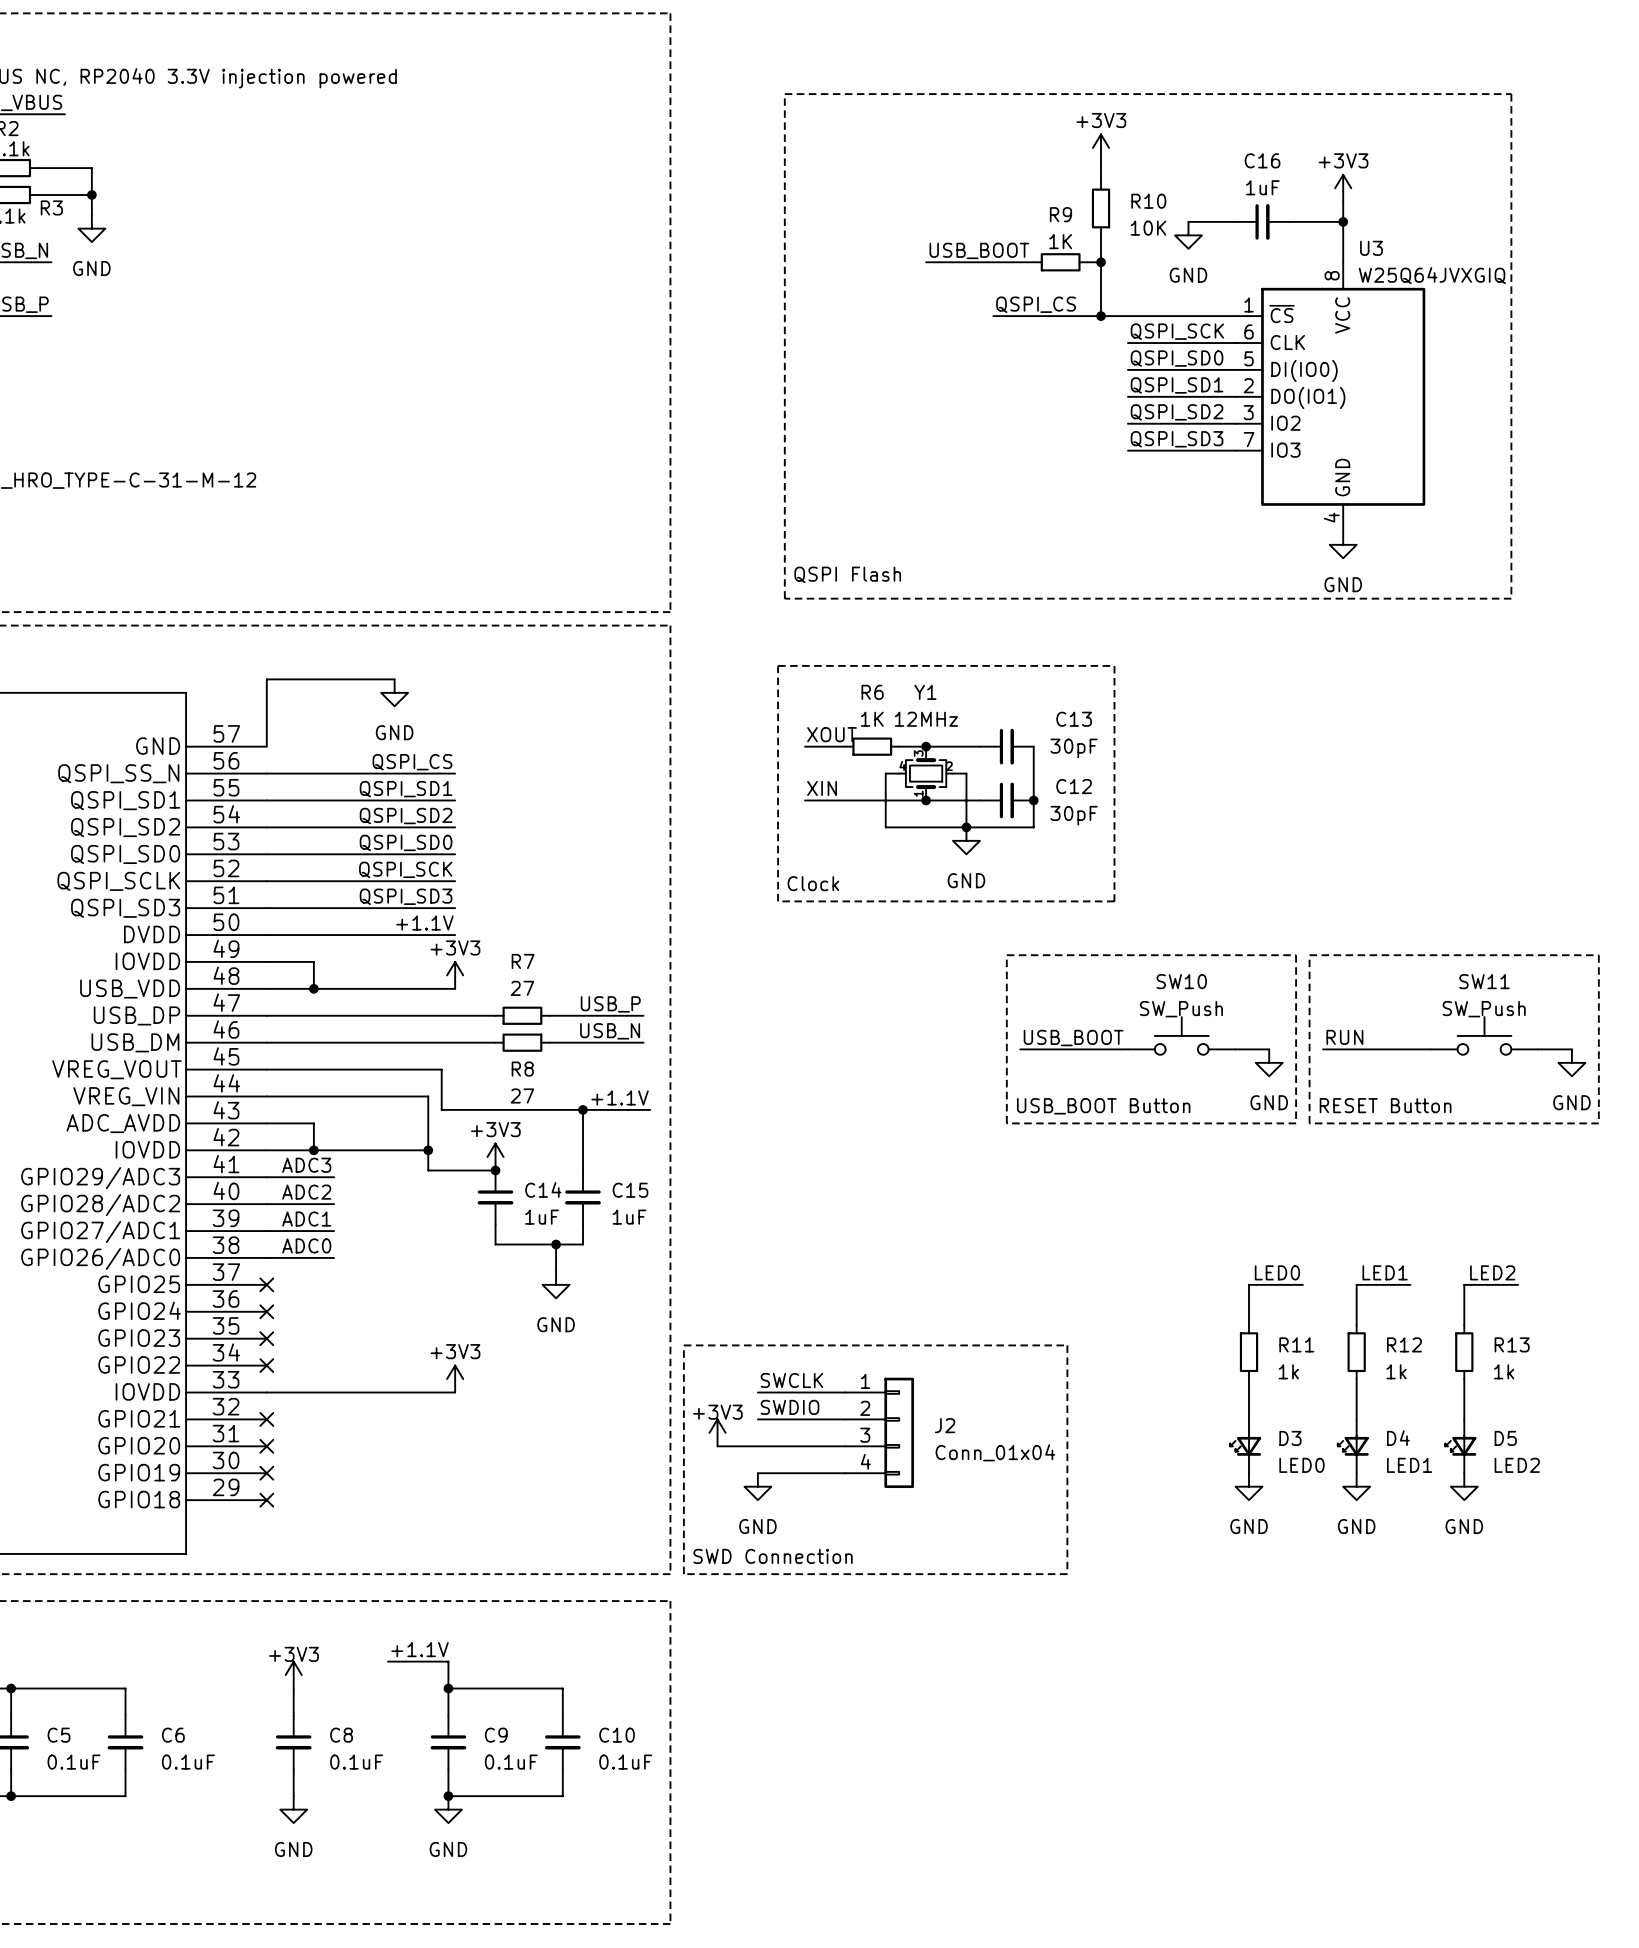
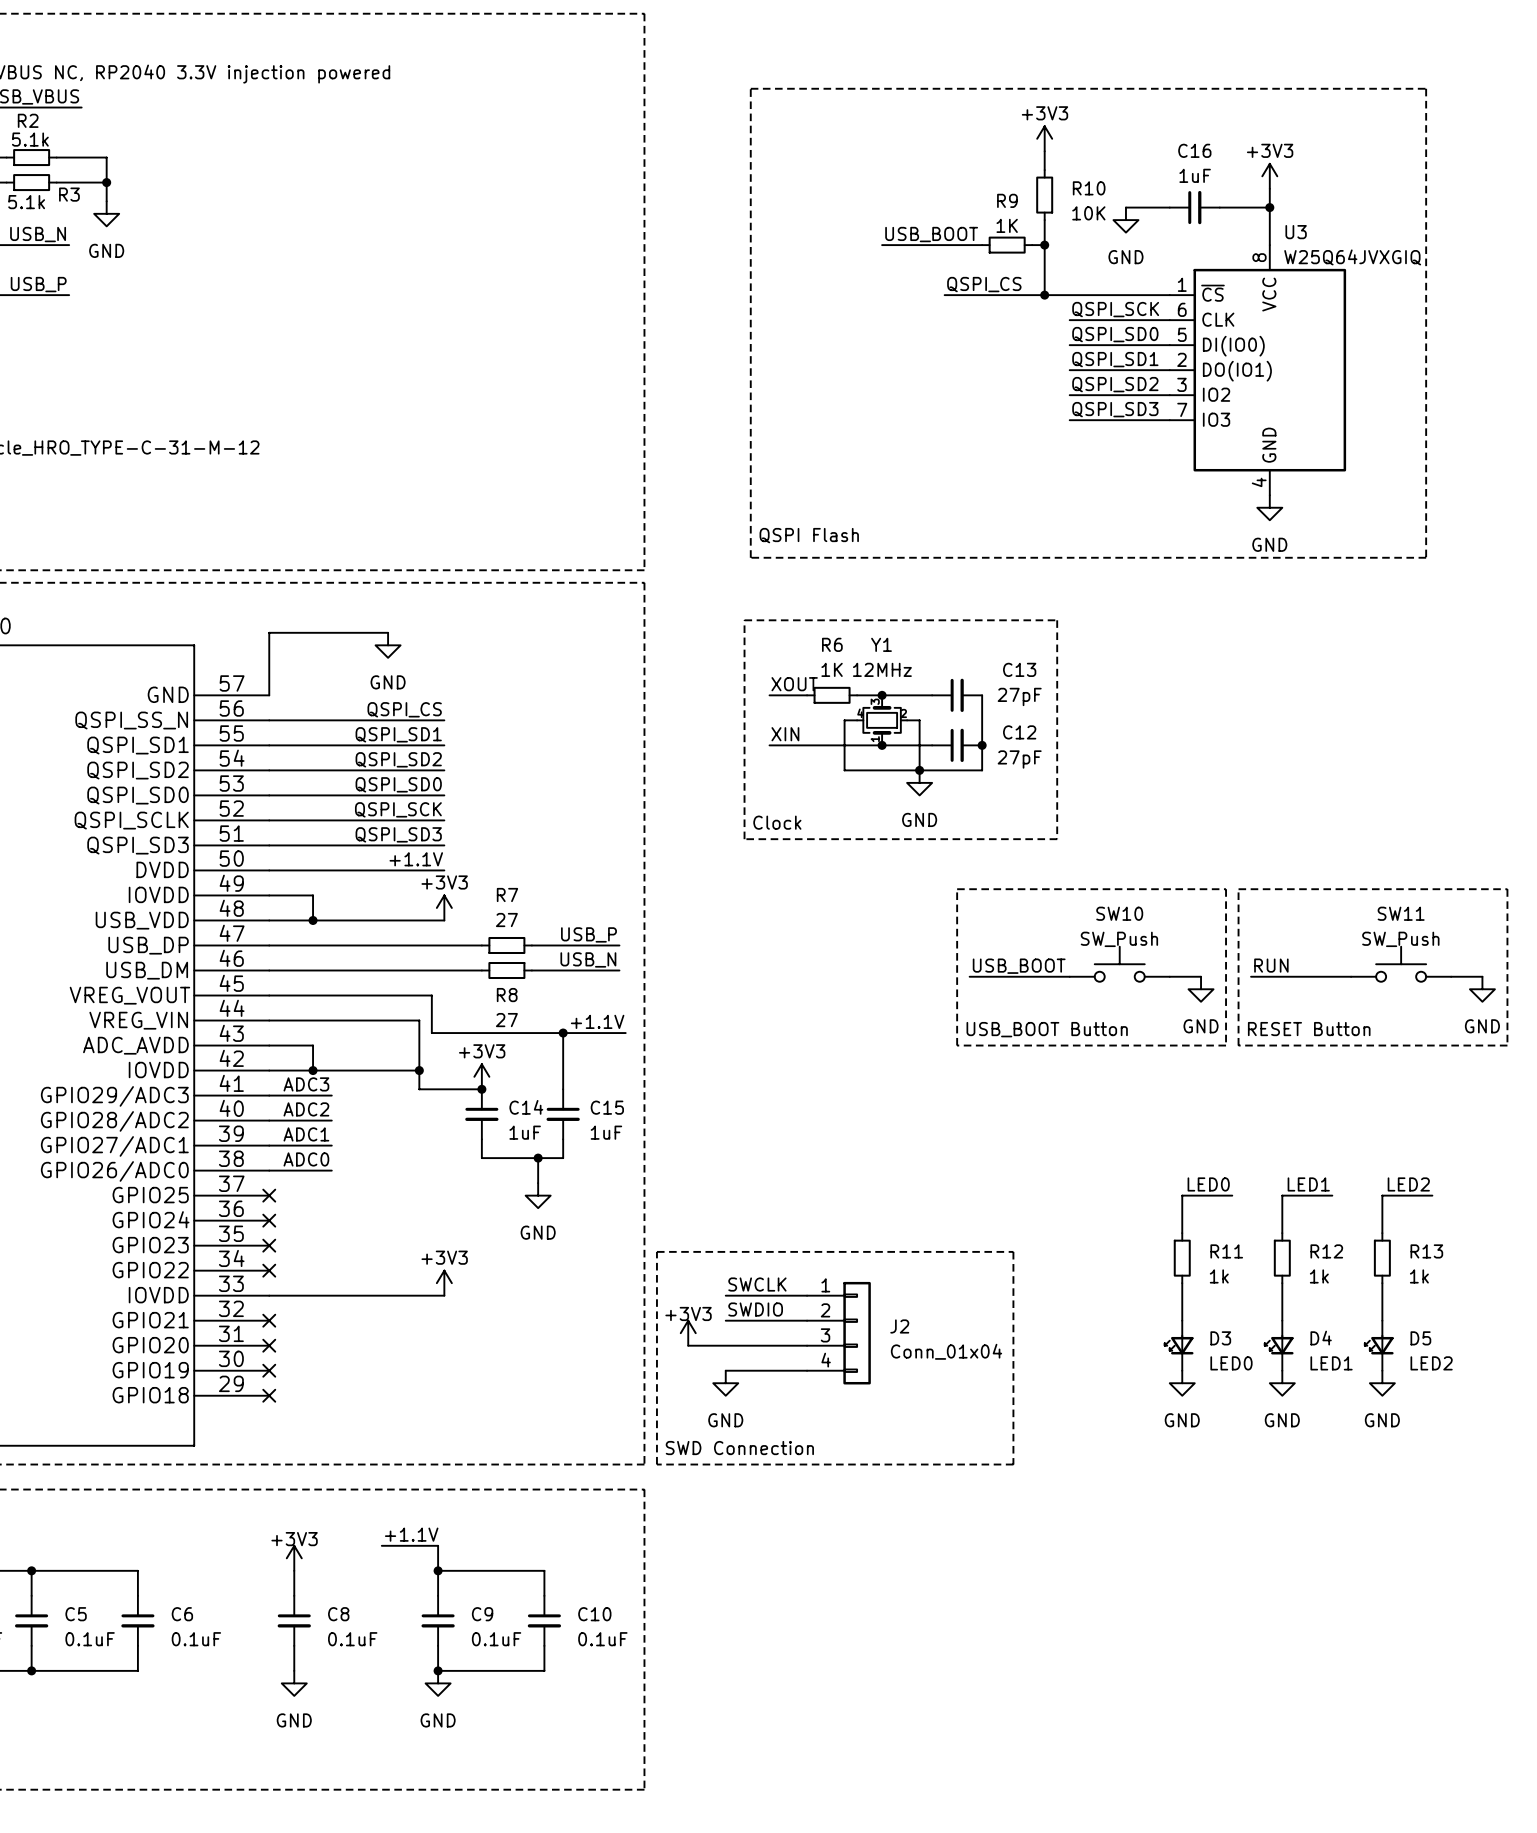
C13 value: 30pF (1074, 748) -> 27pF (1019, 696)
C12 value: 30pF (1074, 815) -> 27pF (1019, 759)

